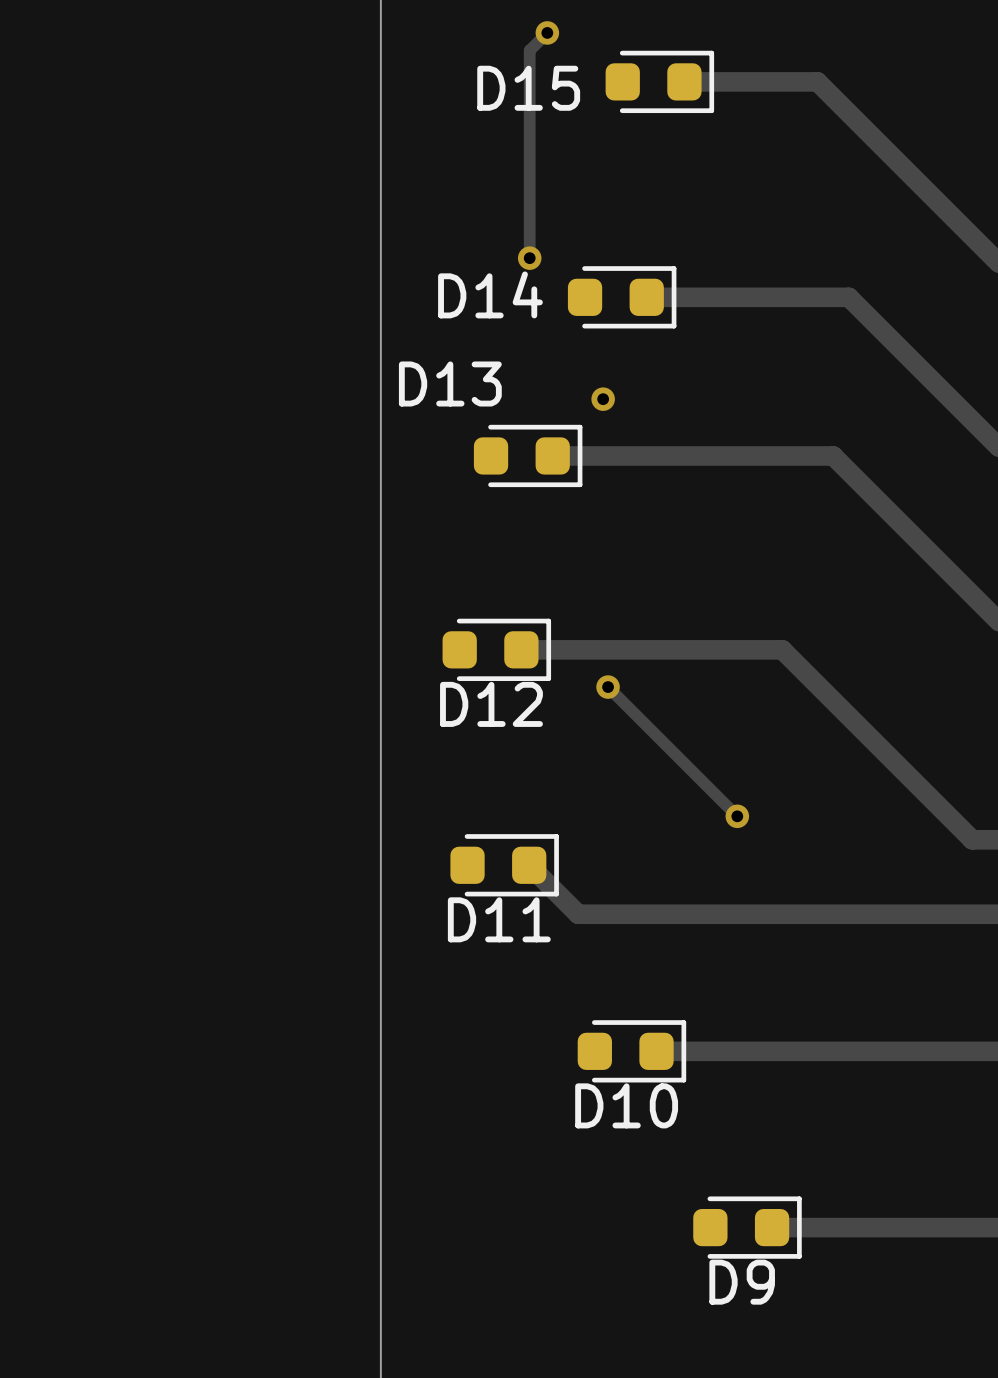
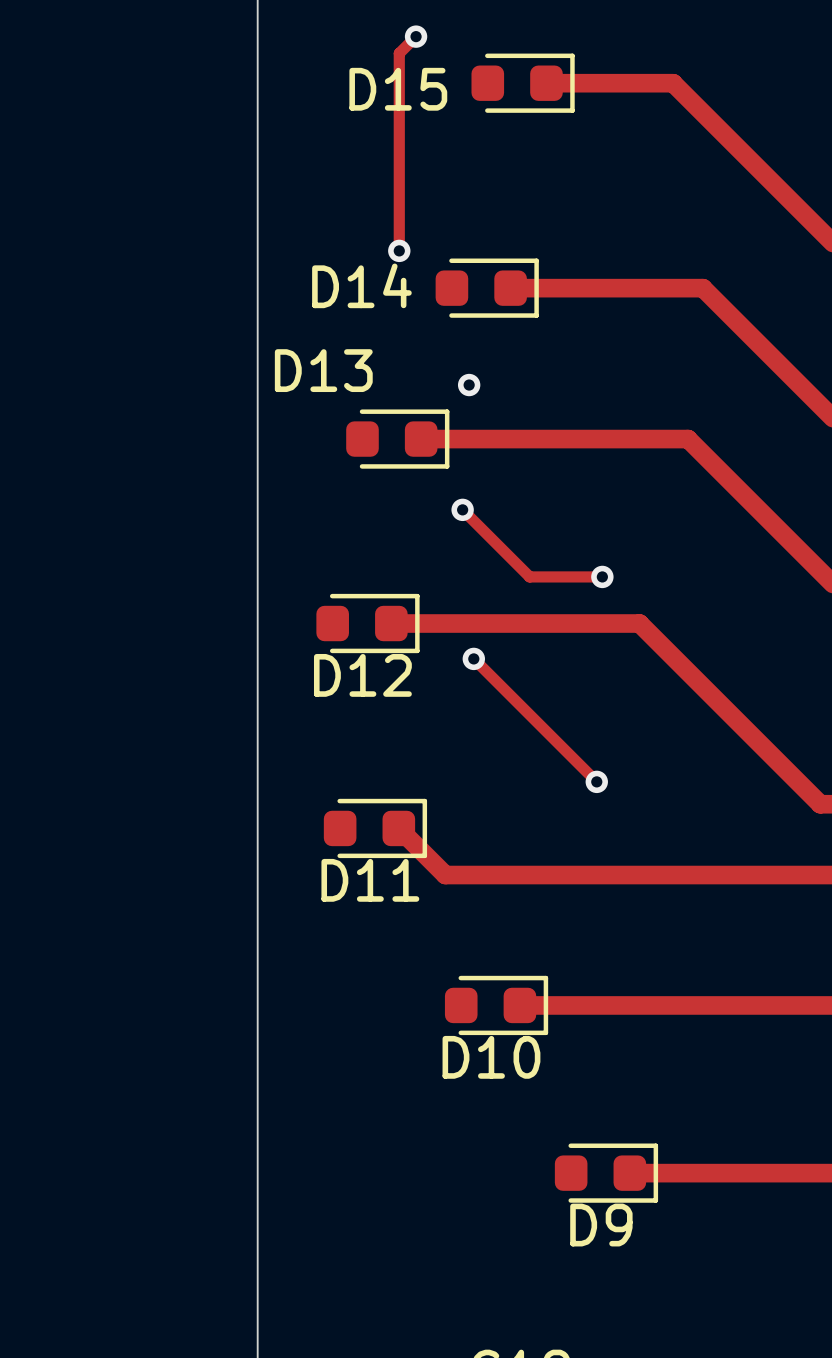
track: none -> (462, 509) (529, 576) (602, 576)
via: none -> (462, 509)
via: none -> (602, 576)

